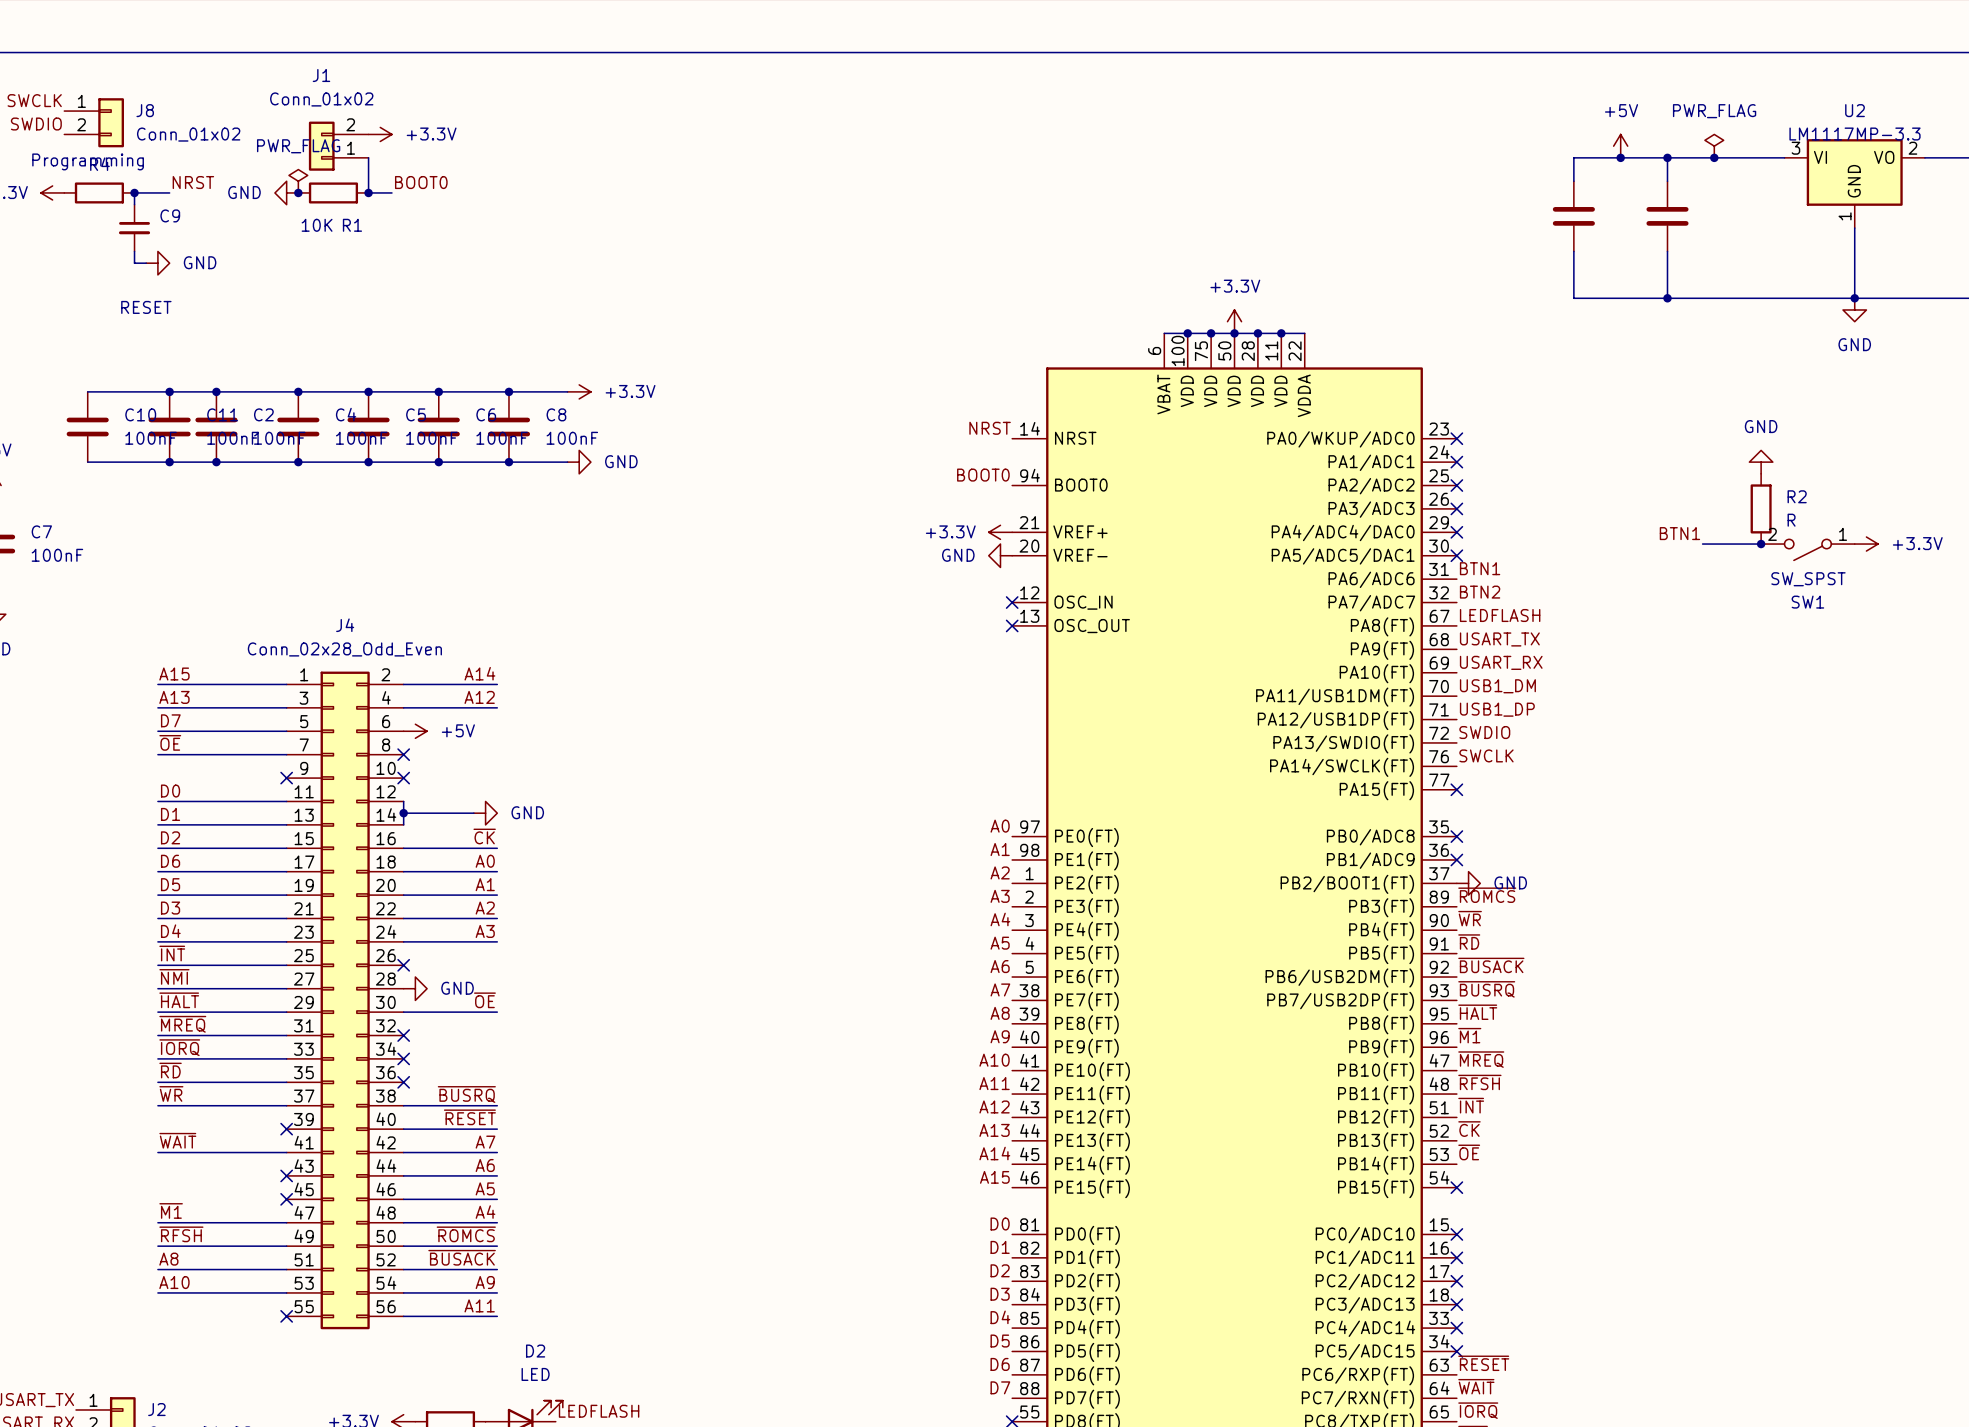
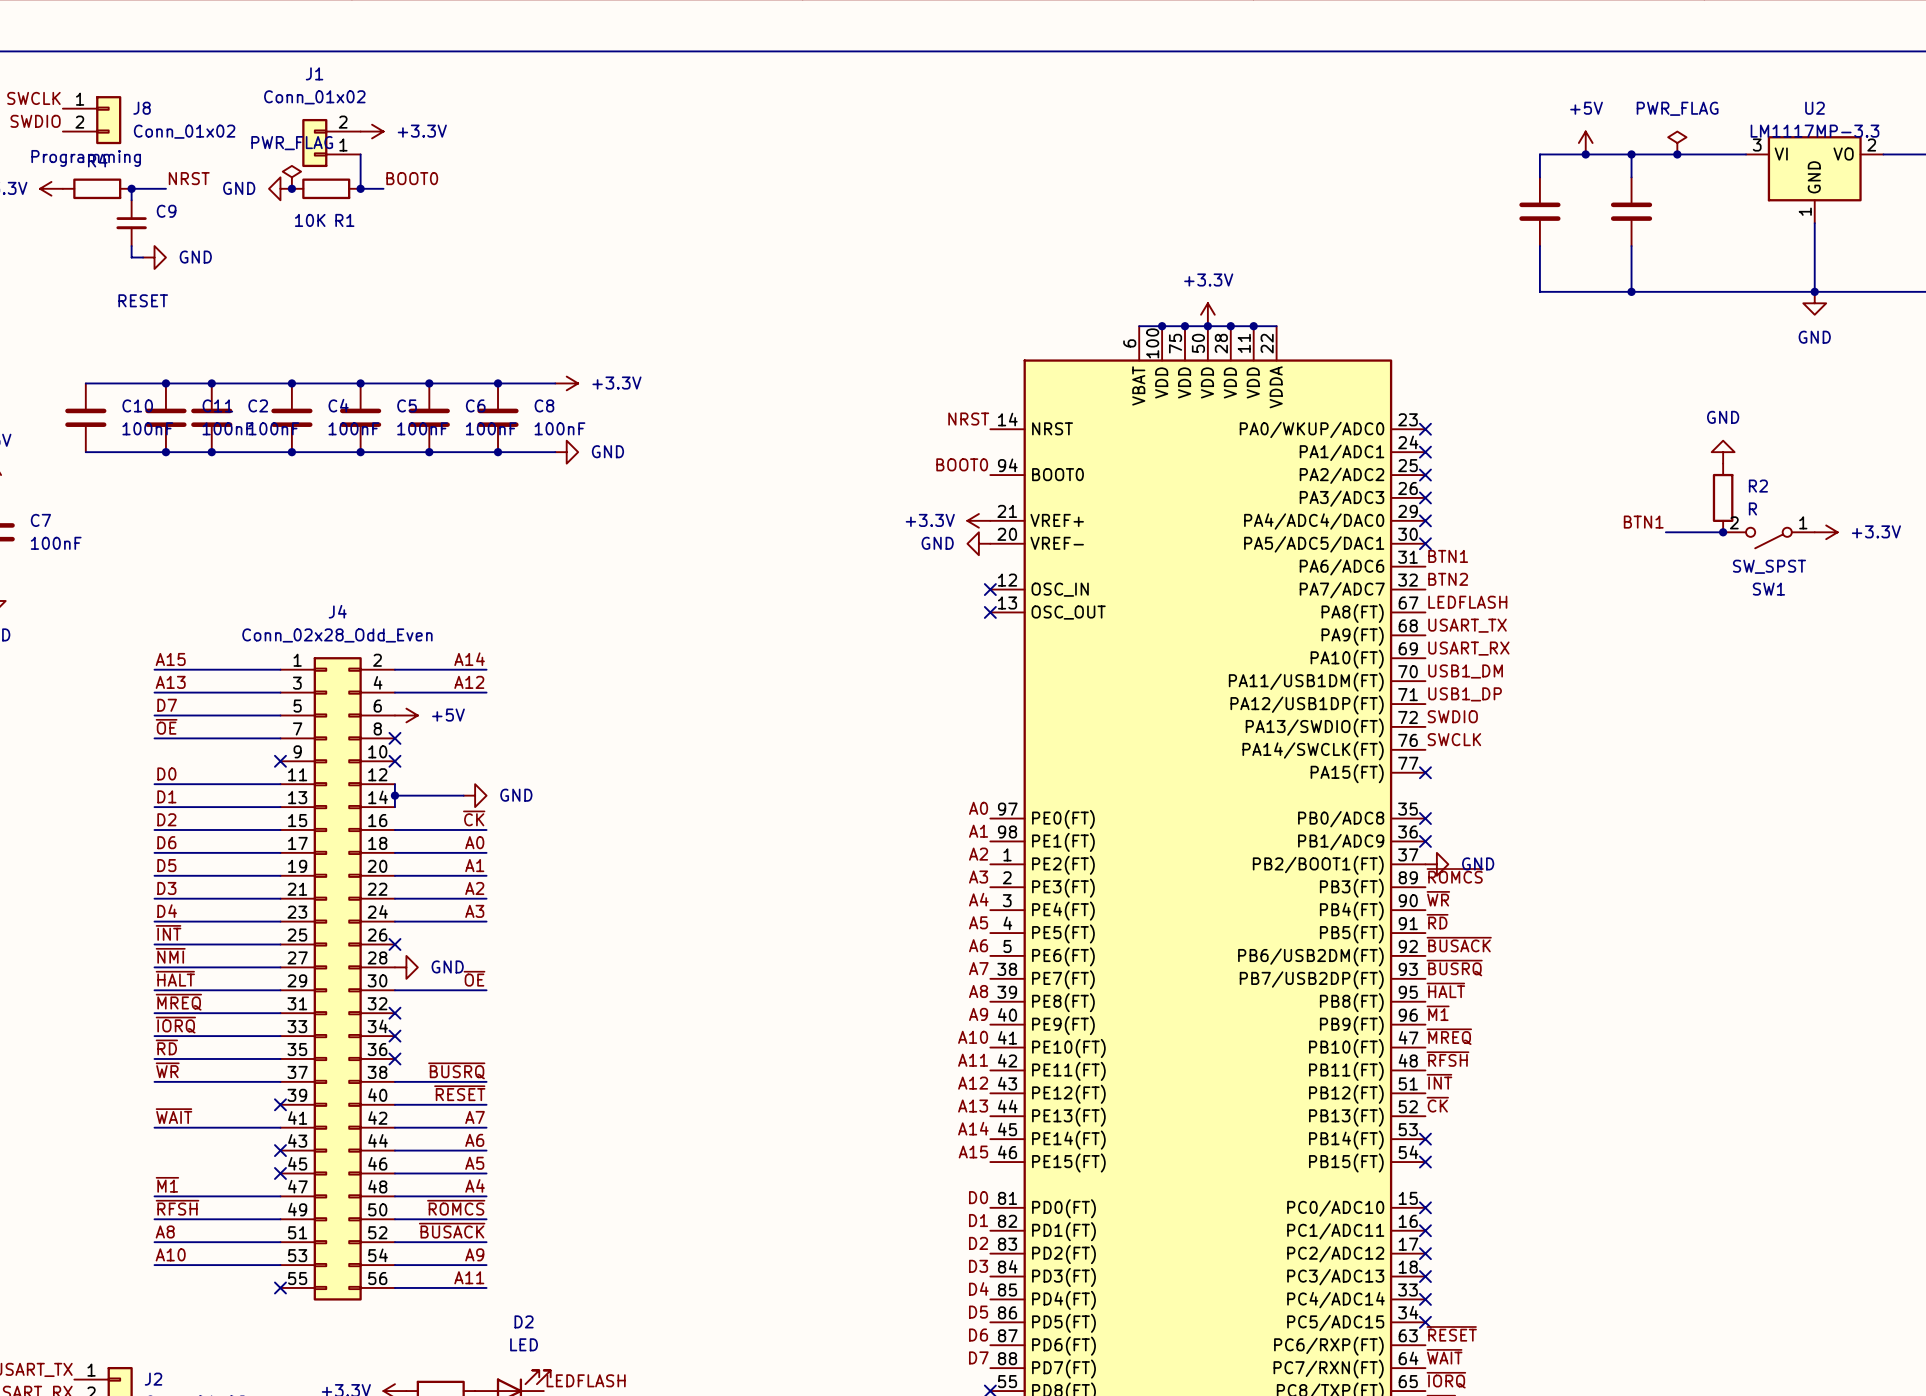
label: ~{OE} (1469, 1152) -> none
no-connect mark: none -> (1425, 1139)

